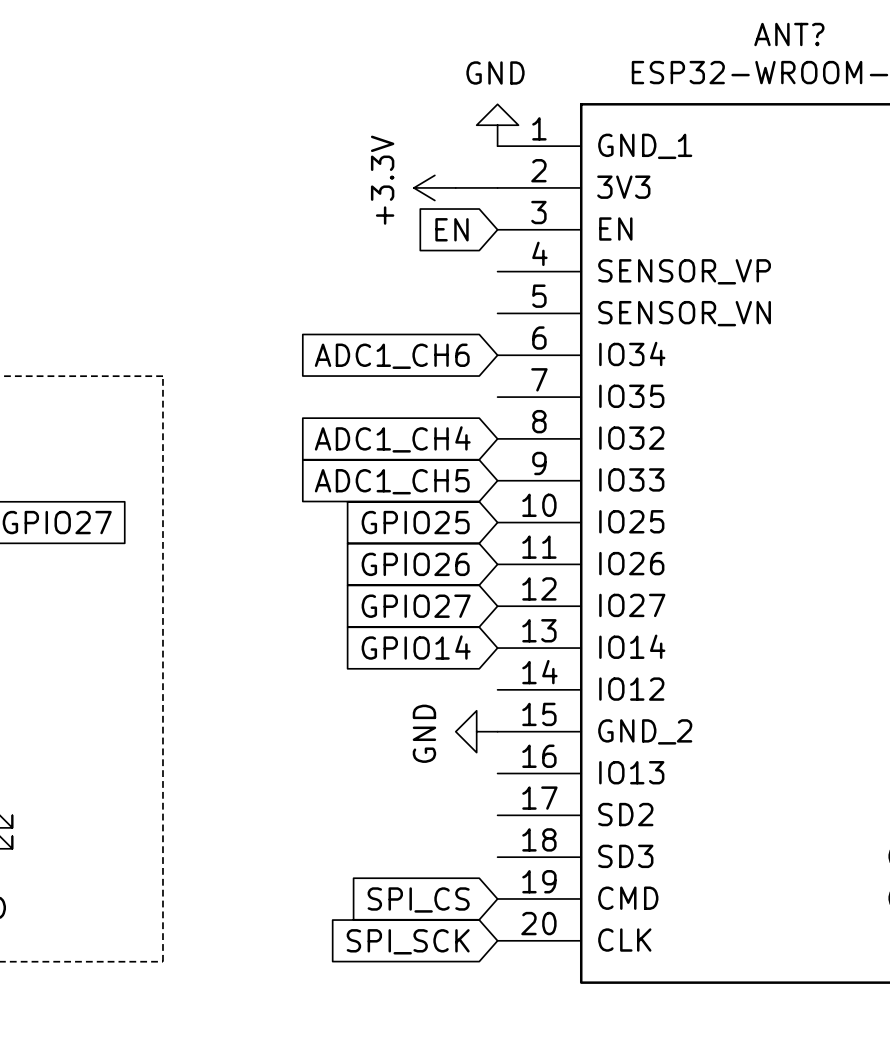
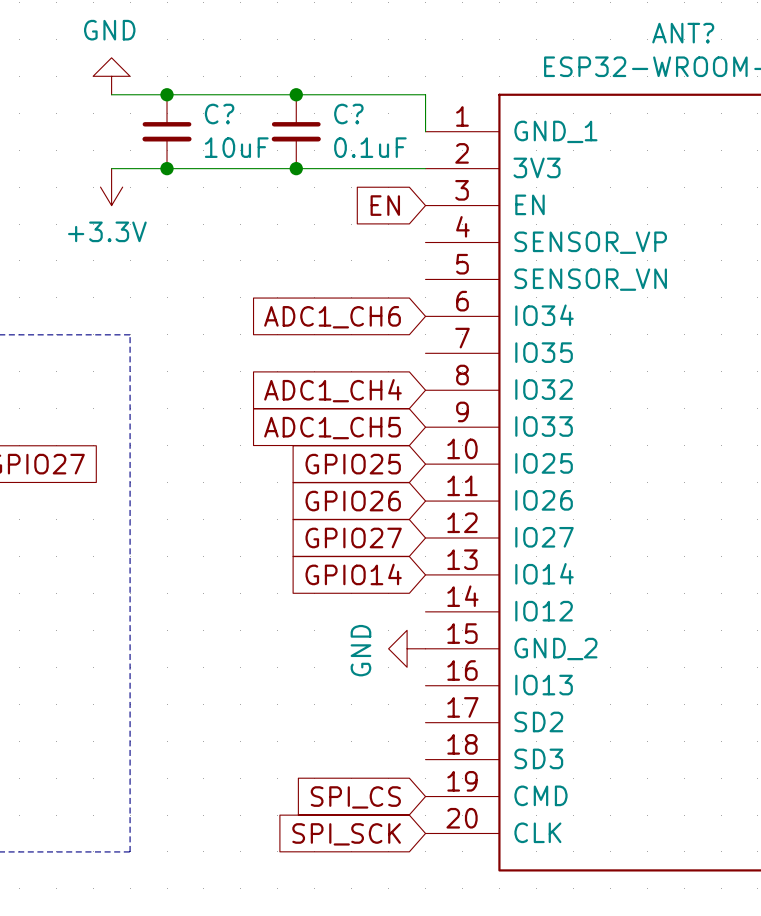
wire: none -> (111, 94) (425, 94) (425, 131)
junction: none -> (167, 94)
junction: none -> (296, 94)
power symbol position: GND (497, 125) -> GND (111, 76)
C?: none -> 10uF (167, 131)
C?: none -> 0.1uF (296, 131)
wire: none -> (111, 168) (388, 168)
junction: none -> (167, 168)
junction: none -> (296, 168)
power symbol rotation: 0° (434, 187) -> 90° counterclockwise (111, 187)
power symbol position: +3.3V (434, 187) -> +3.3V (111, 187)

